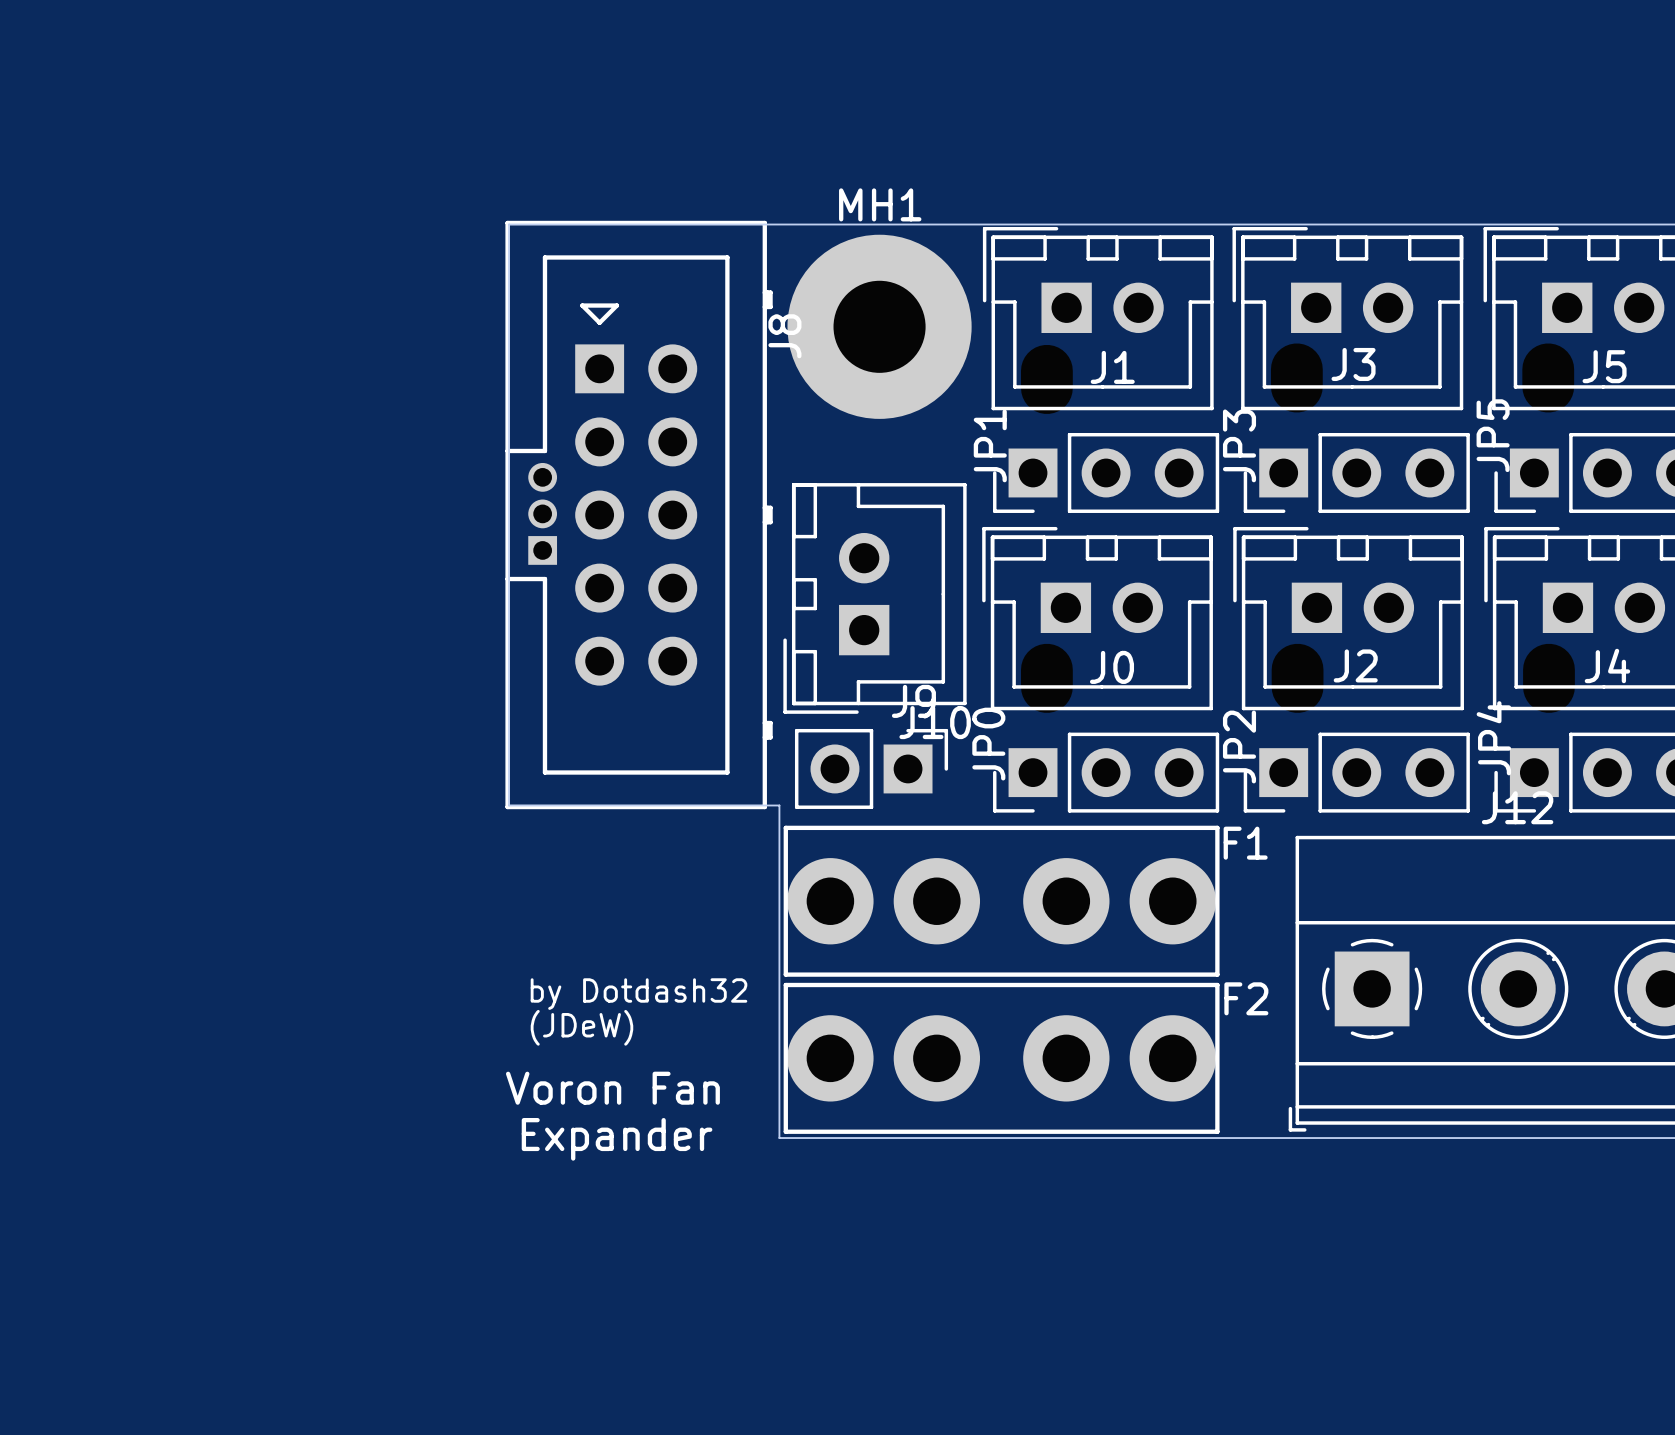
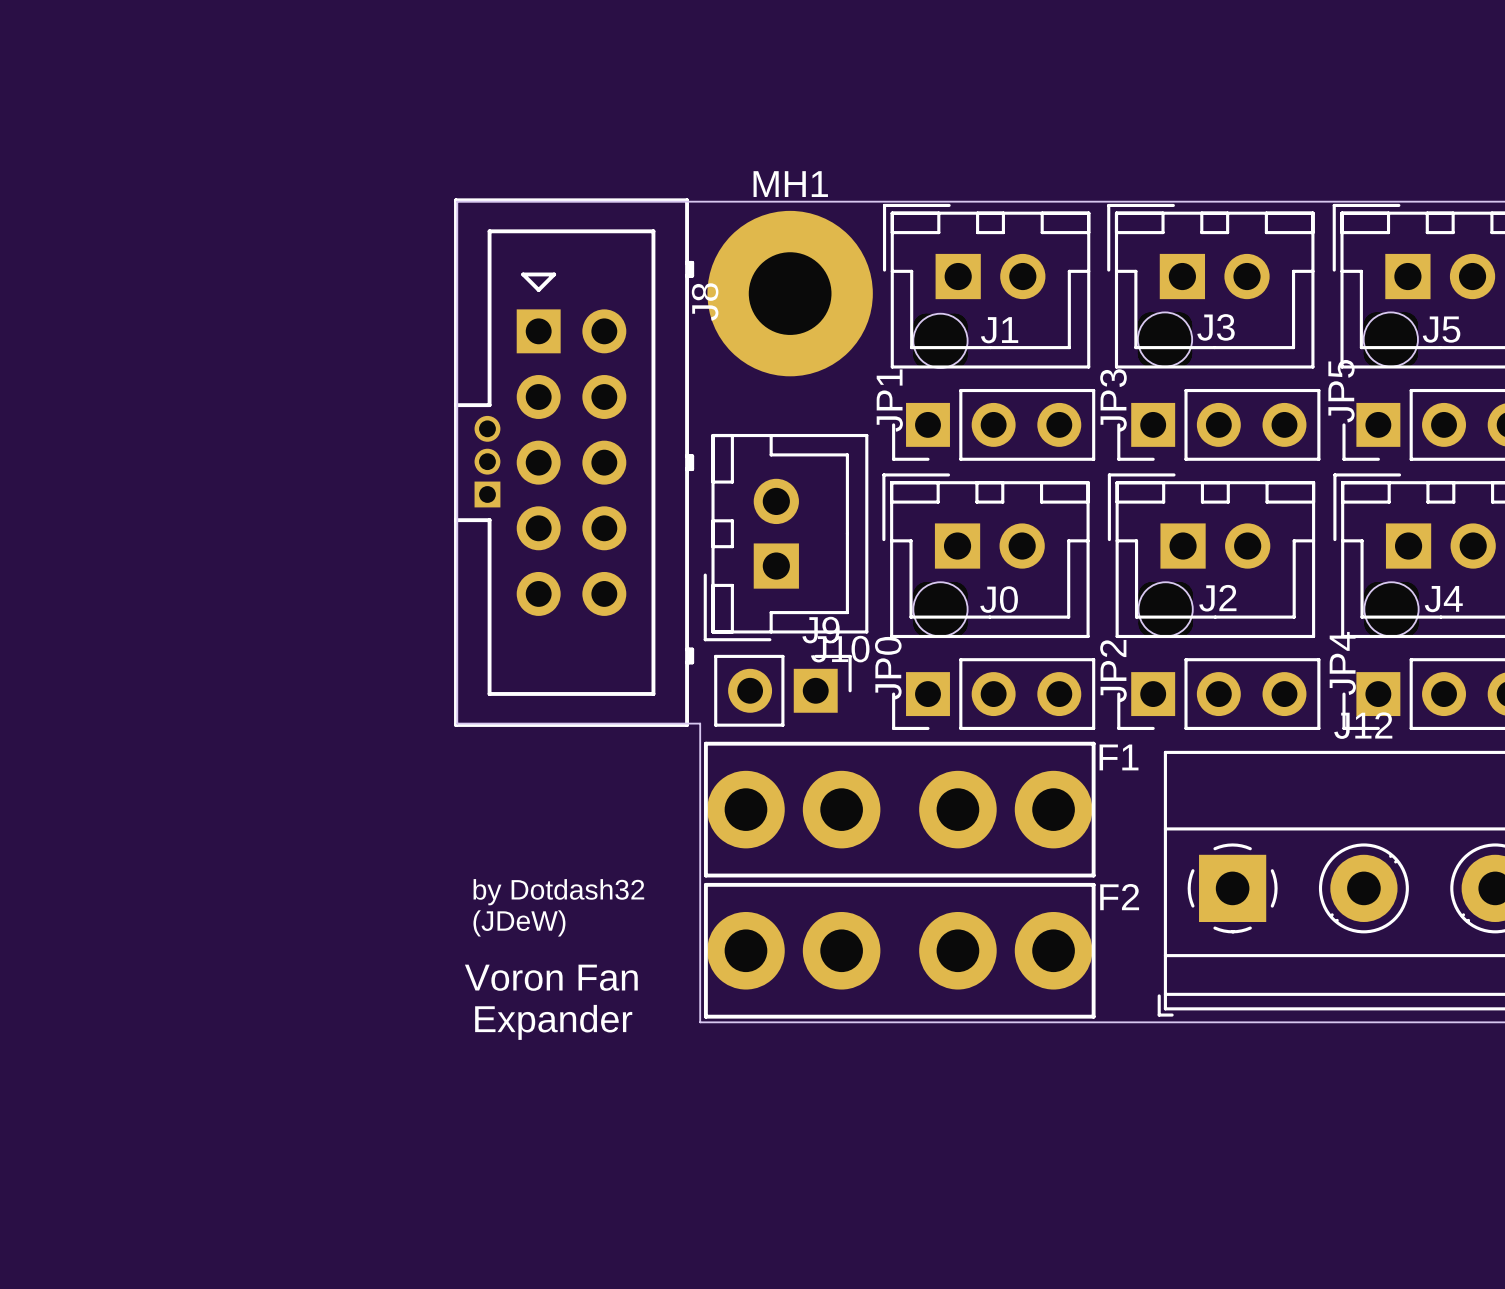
part footprint: [1270, 343, 1323, 413] -> [1137, 312, 1193, 367]
part footprint: [1522, 343, 1575, 413] -> [1363, 312, 1418, 367]
part footprint: [1021, 344, 1073, 414] -> [913, 313, 968, 369]
part footprint: [1021, 643, 1073, 713] -> [913, 582, 968, 637]
part footprint: [1271, 643, 1324, 713] -> [1138, 582, 1193, 637]
part footprint: [1523, 643, 1575, 713] -> [1364, 582, 1419, 637]

